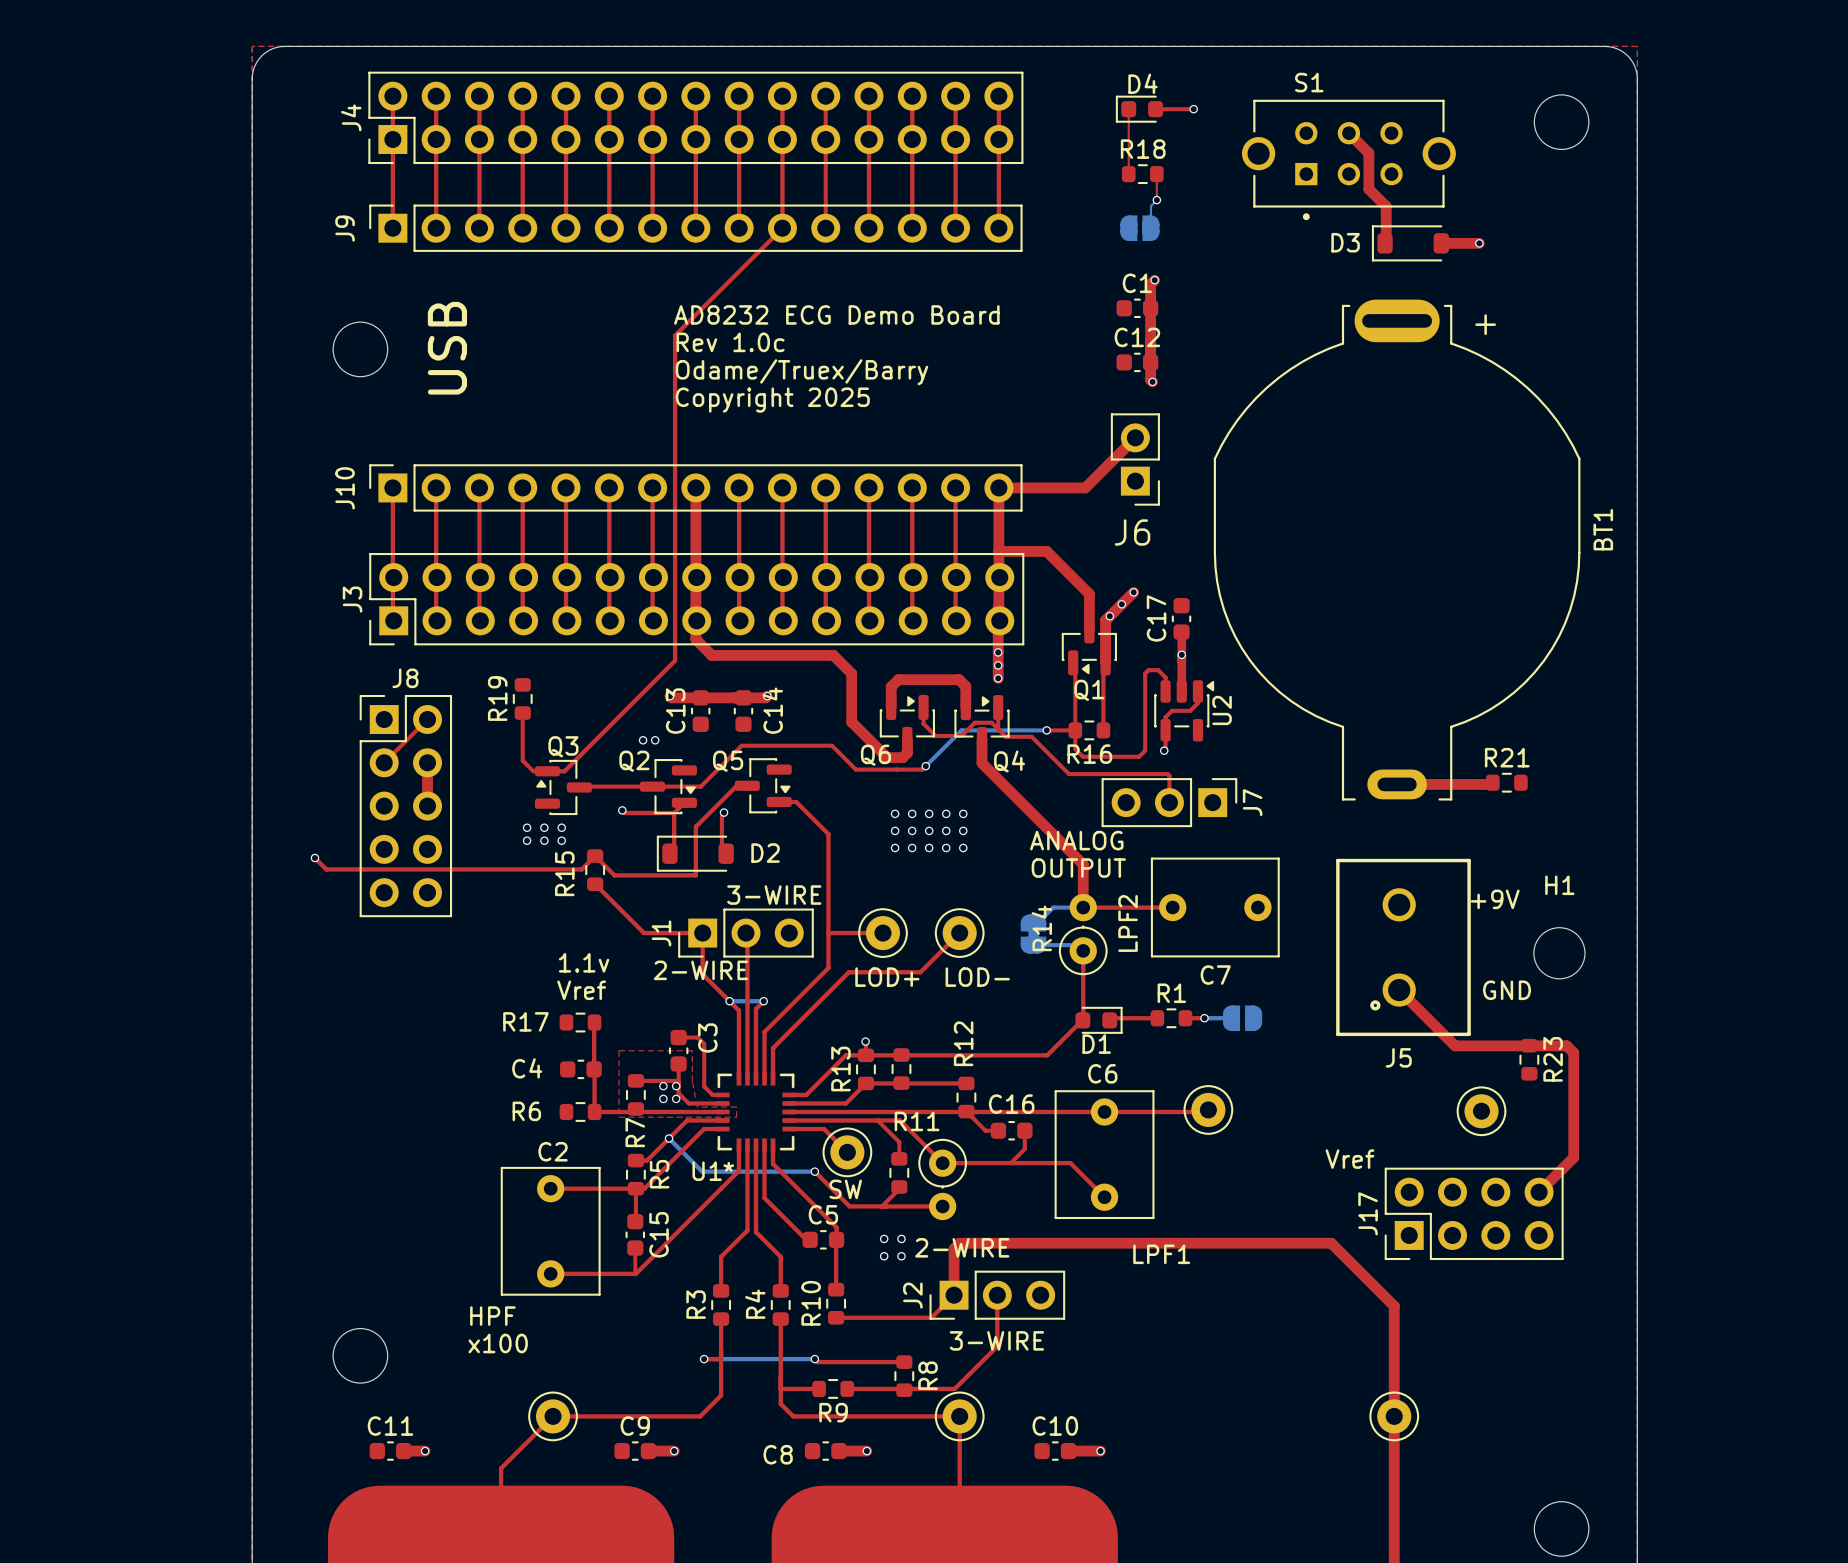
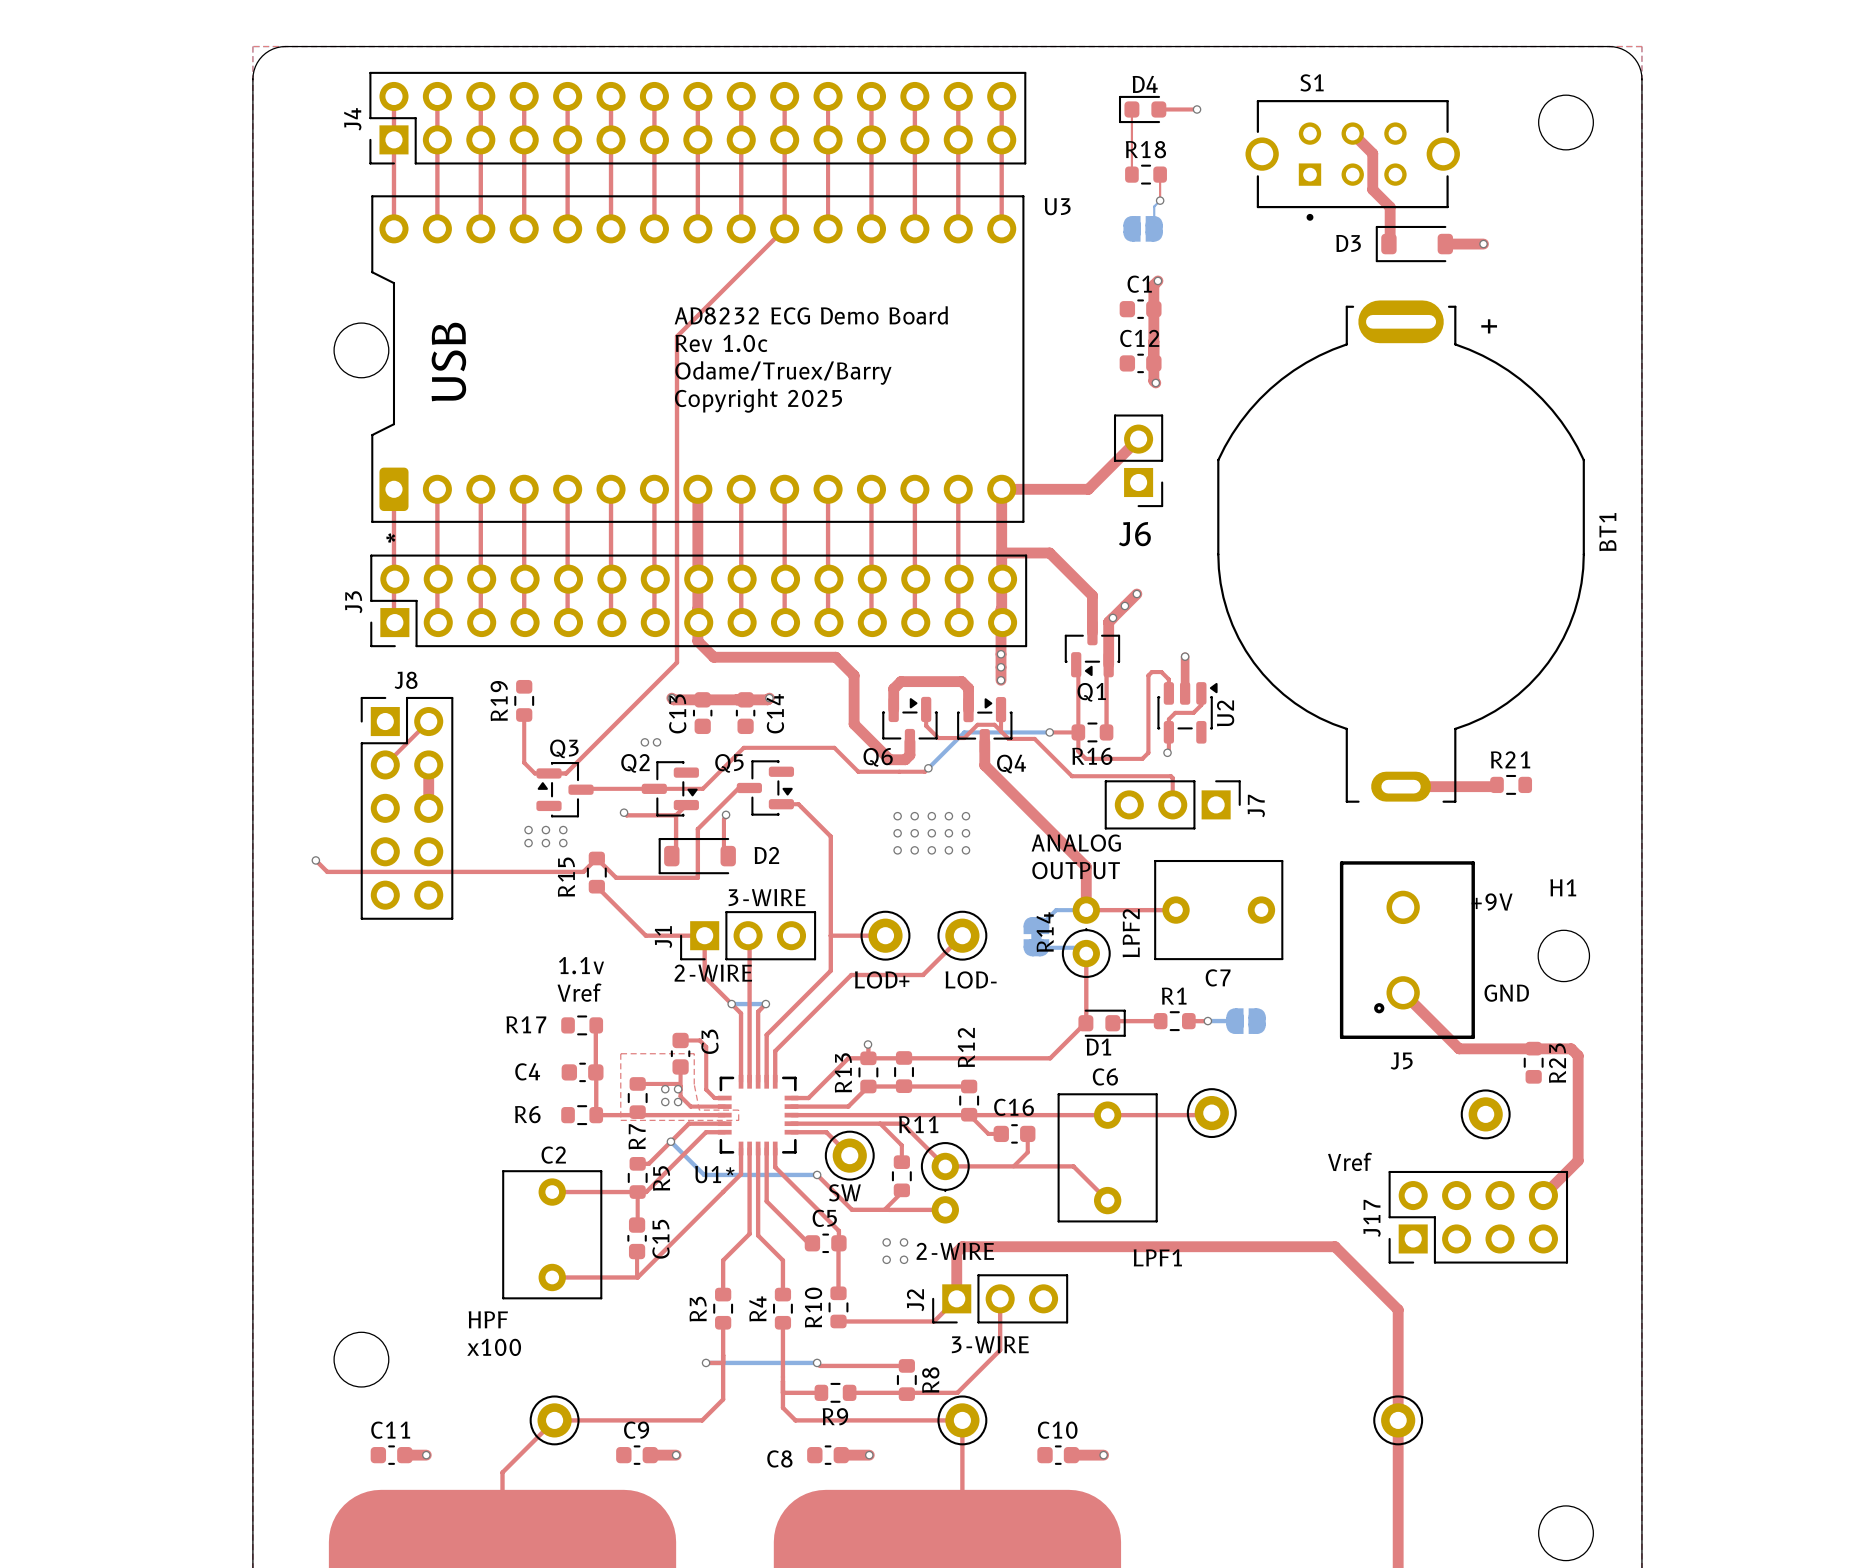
J9: (695, 228) -> none
U3: none -> (697, 359)
J10: (695, 487) -> none
C17: (1181, 618) -> none
top track: (1181, 632) (1181, 654) -> none

